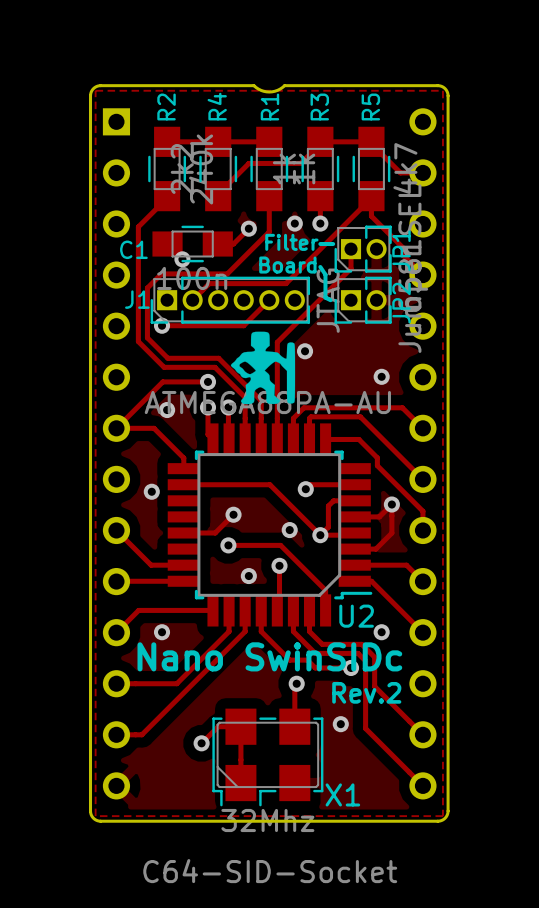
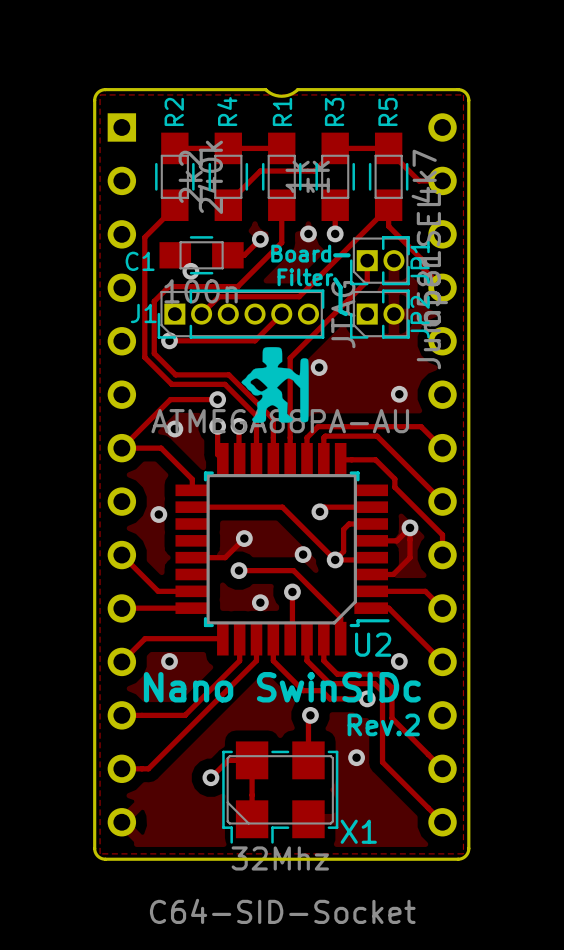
text: Filter (291, 242) -> Board (301, 253)
text: Board (287, 265) -> Filter (305, 277)

